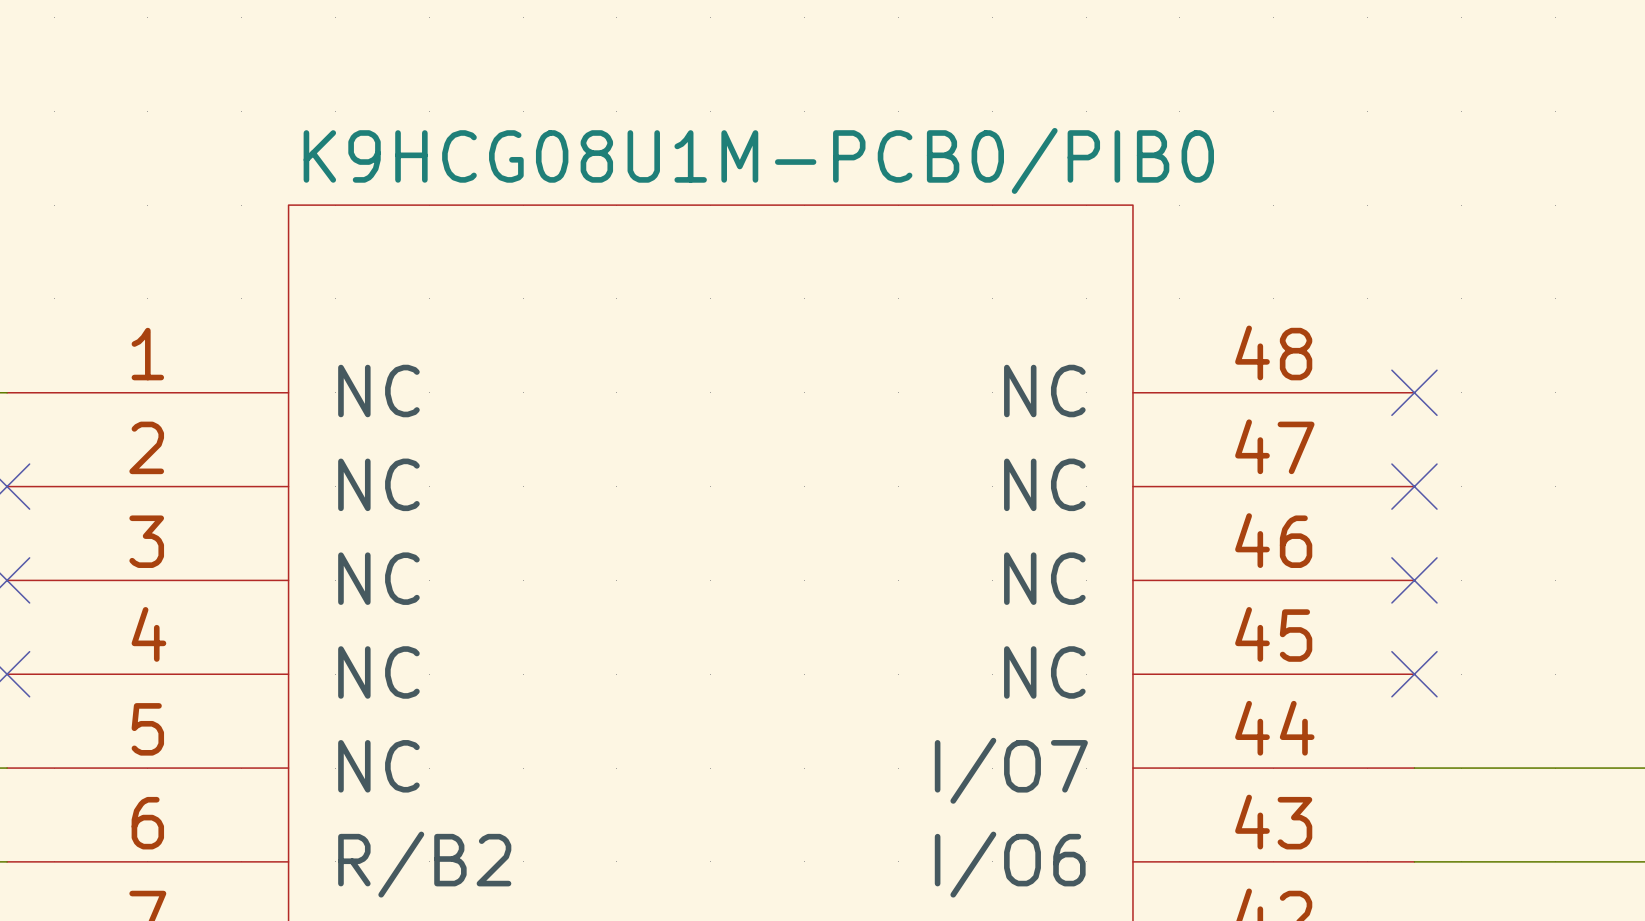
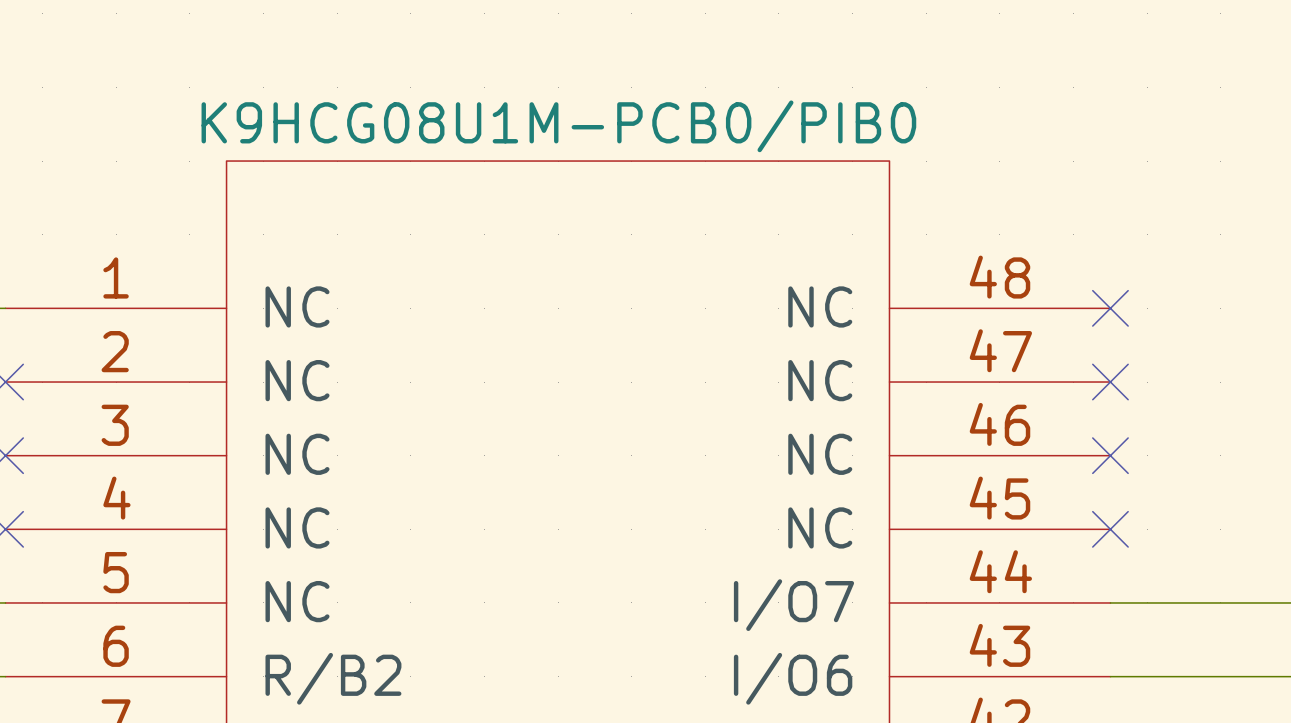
part value position: K9HCG08U1M-PCB0/PIB0 (758, 160) -> K9HCG08U1M-PCB0/PIB0 (558, 126)

